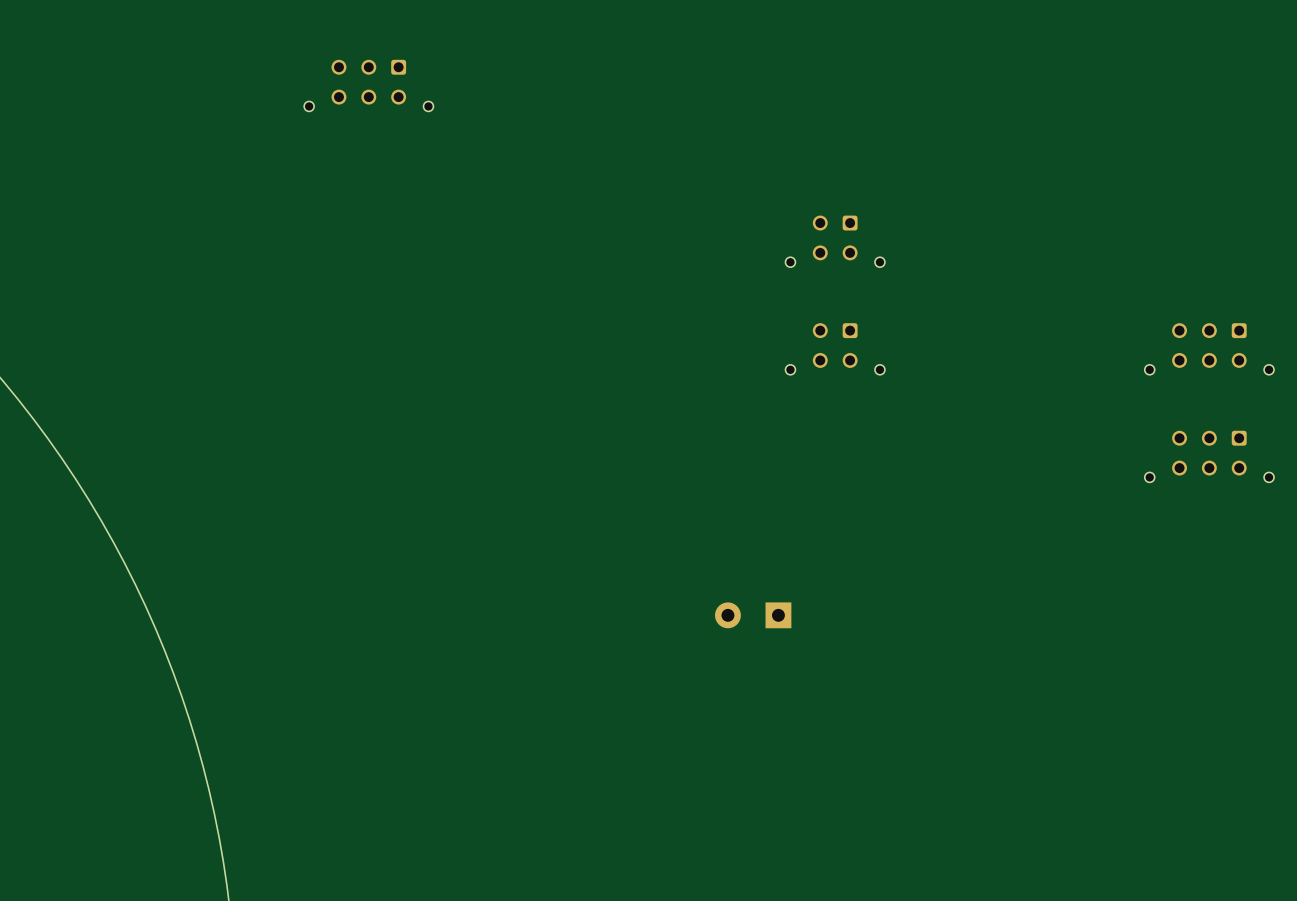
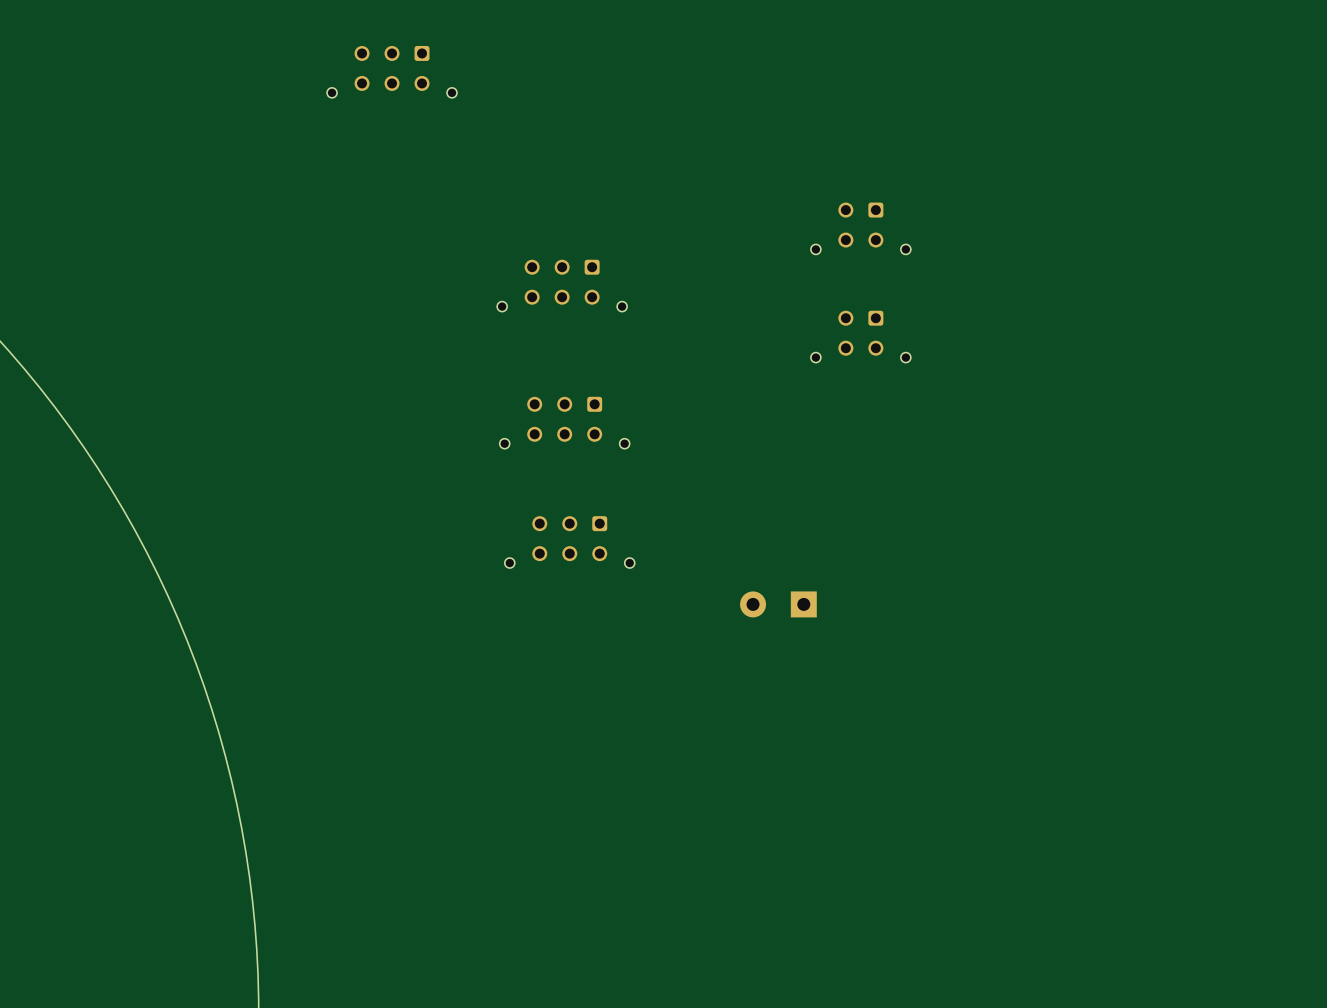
part: none -> (562, 285)
part: (1209, 348) -> none
part: none -> (564, 422)
part: (1209, 456) -> none
part: none -> (569, 542)

